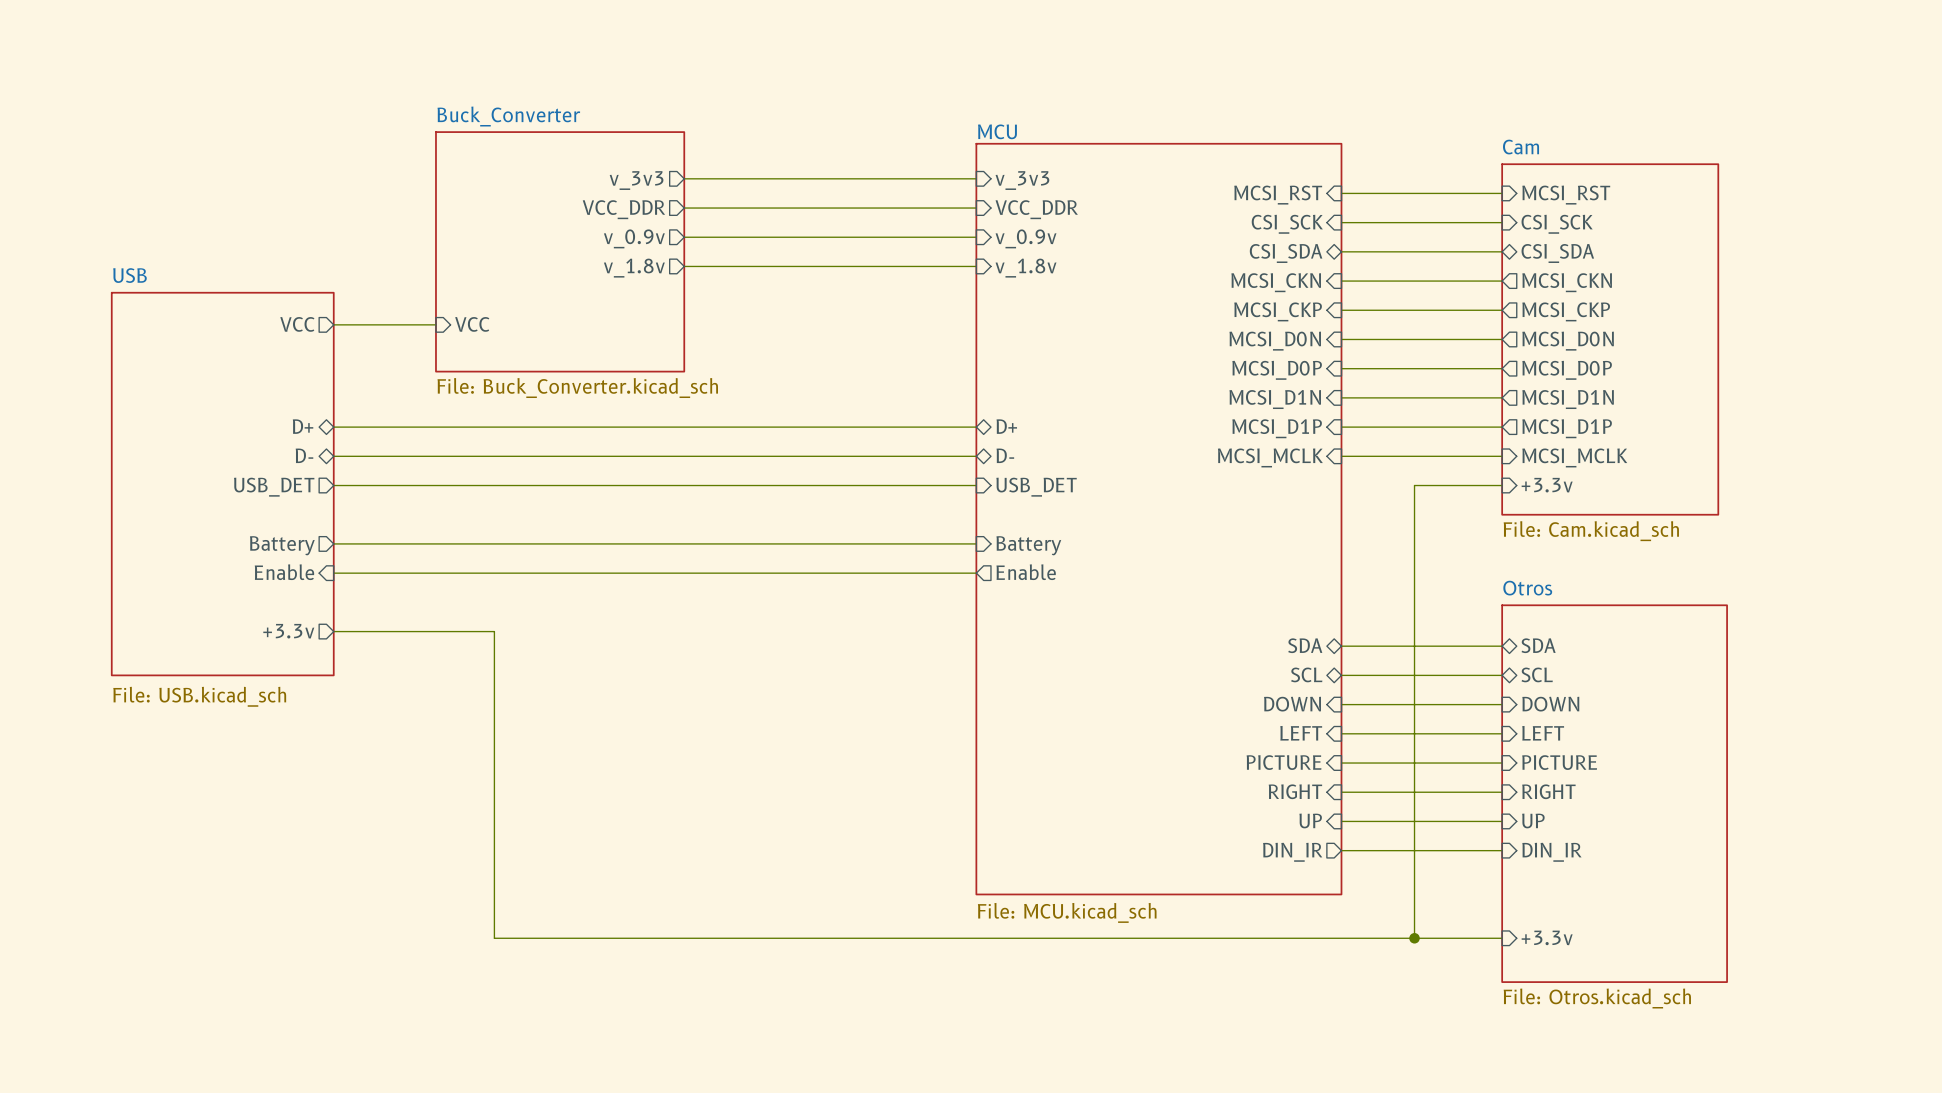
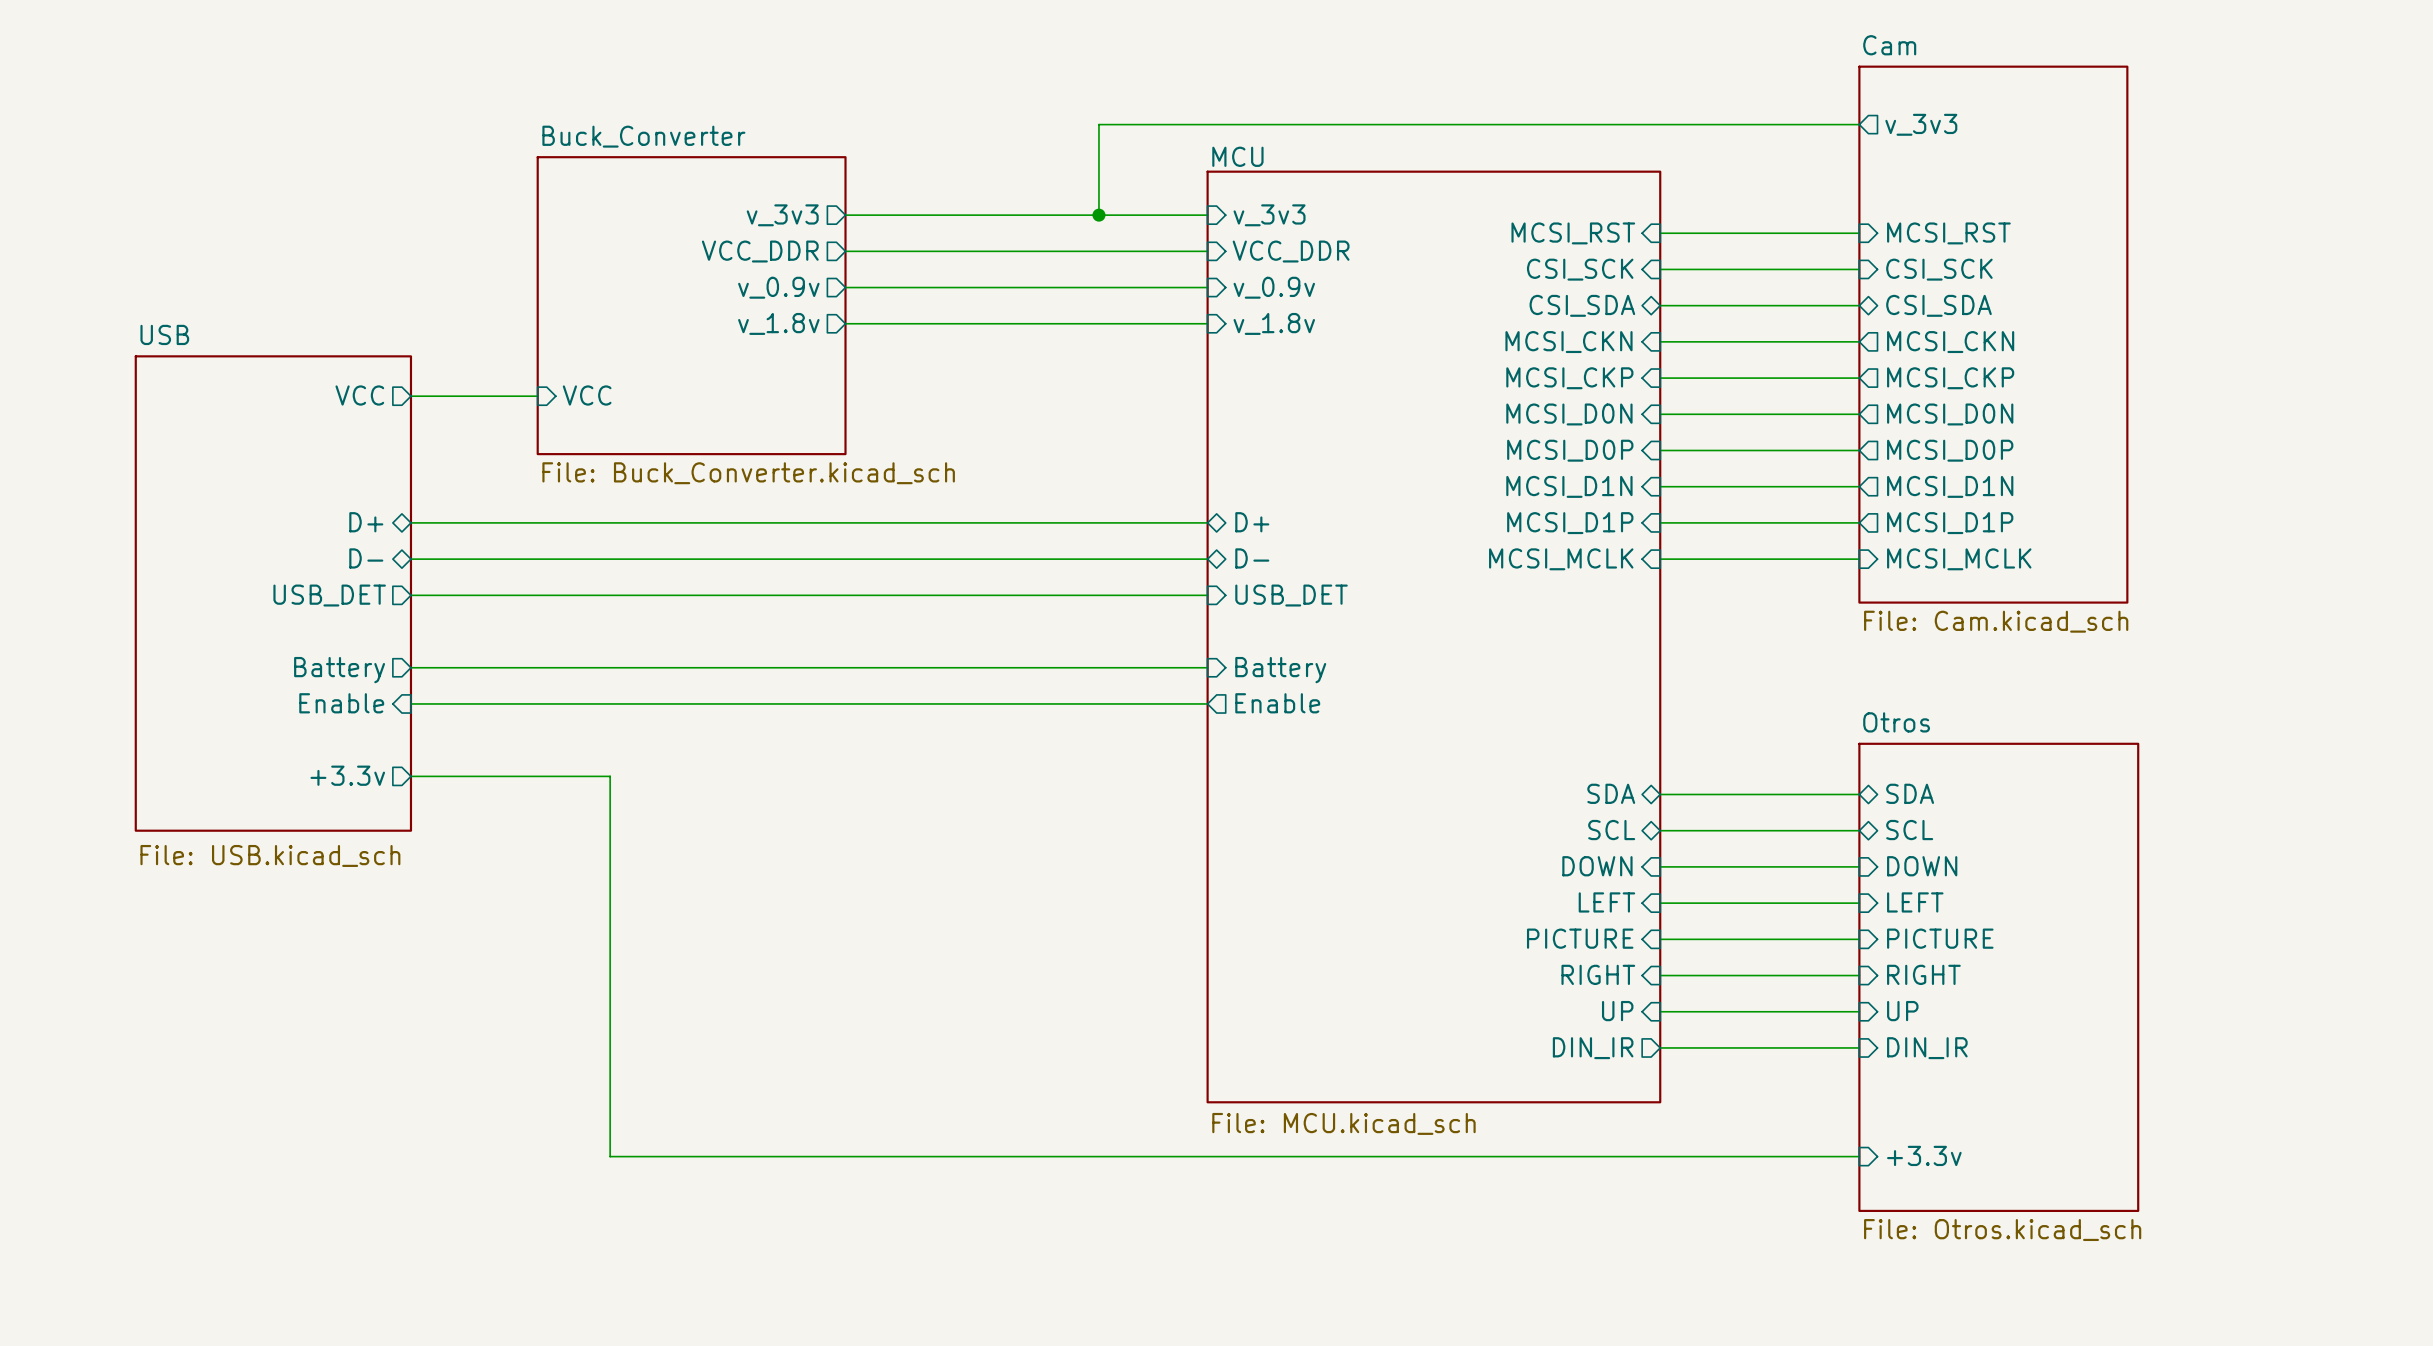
wire: none -> (1859, 124) (1098, 124) (1098, 215)
sheet pin: none -> v_3v3 (1921, 124)
junction: none -> (1098, 215)
sheet Cam: none -> File: Cam.kicad_sch (1993, 334)
sheet Cam: File: Cam.kicad_sch (1610, 339) -> none
wire: (1502, 485) (1414, 485) (1414, 938) -> none
sheet pin: +3.3v (1547, 485) -> none
junction: (1414, 938) -> none

